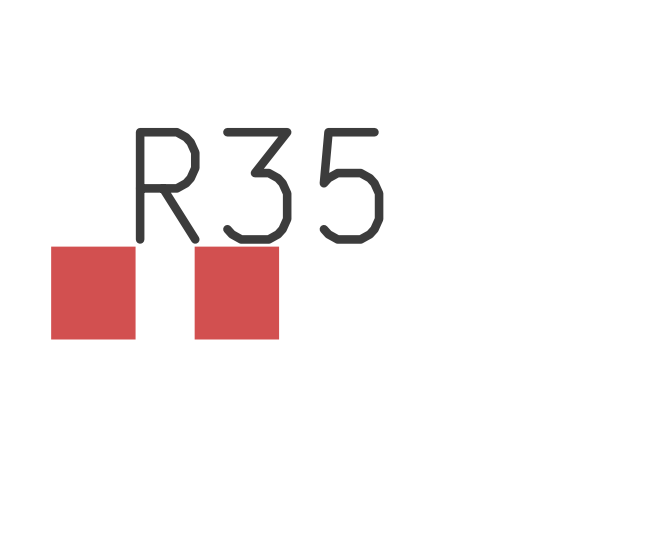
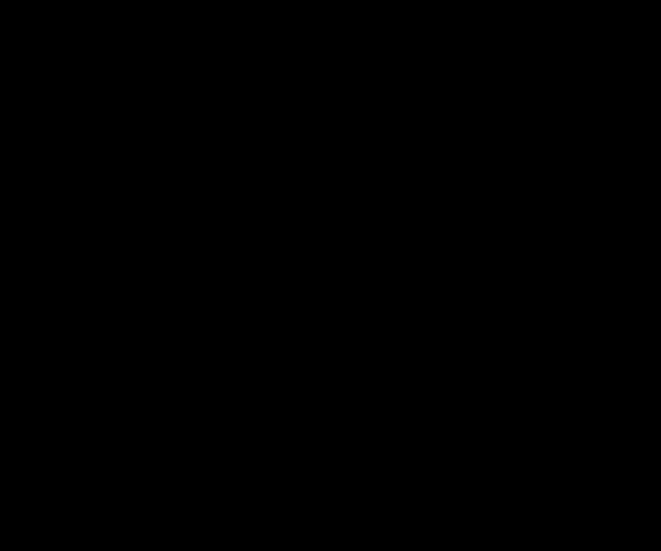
R35: (165, 293) -> none

